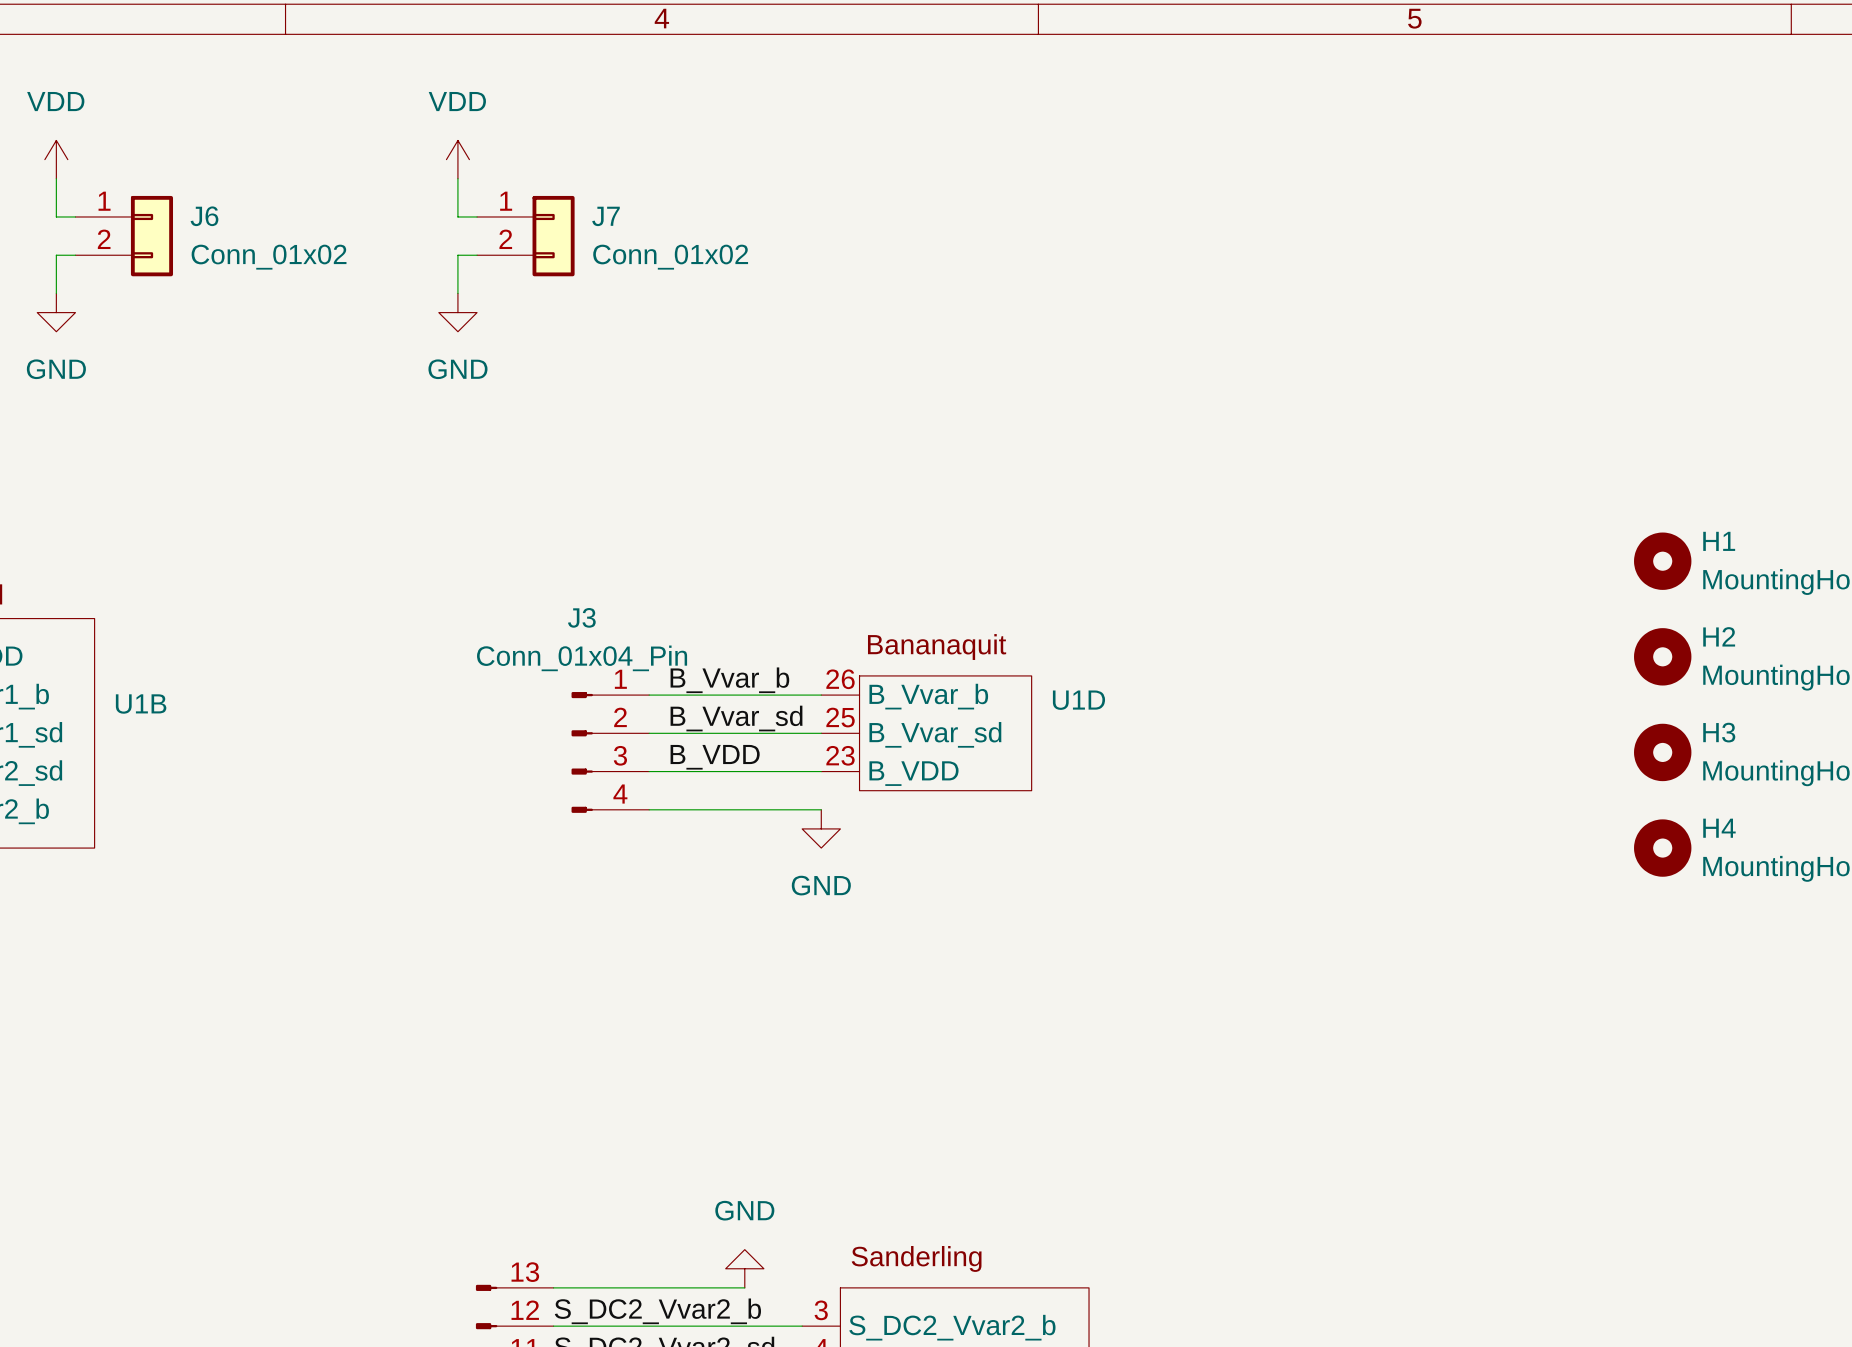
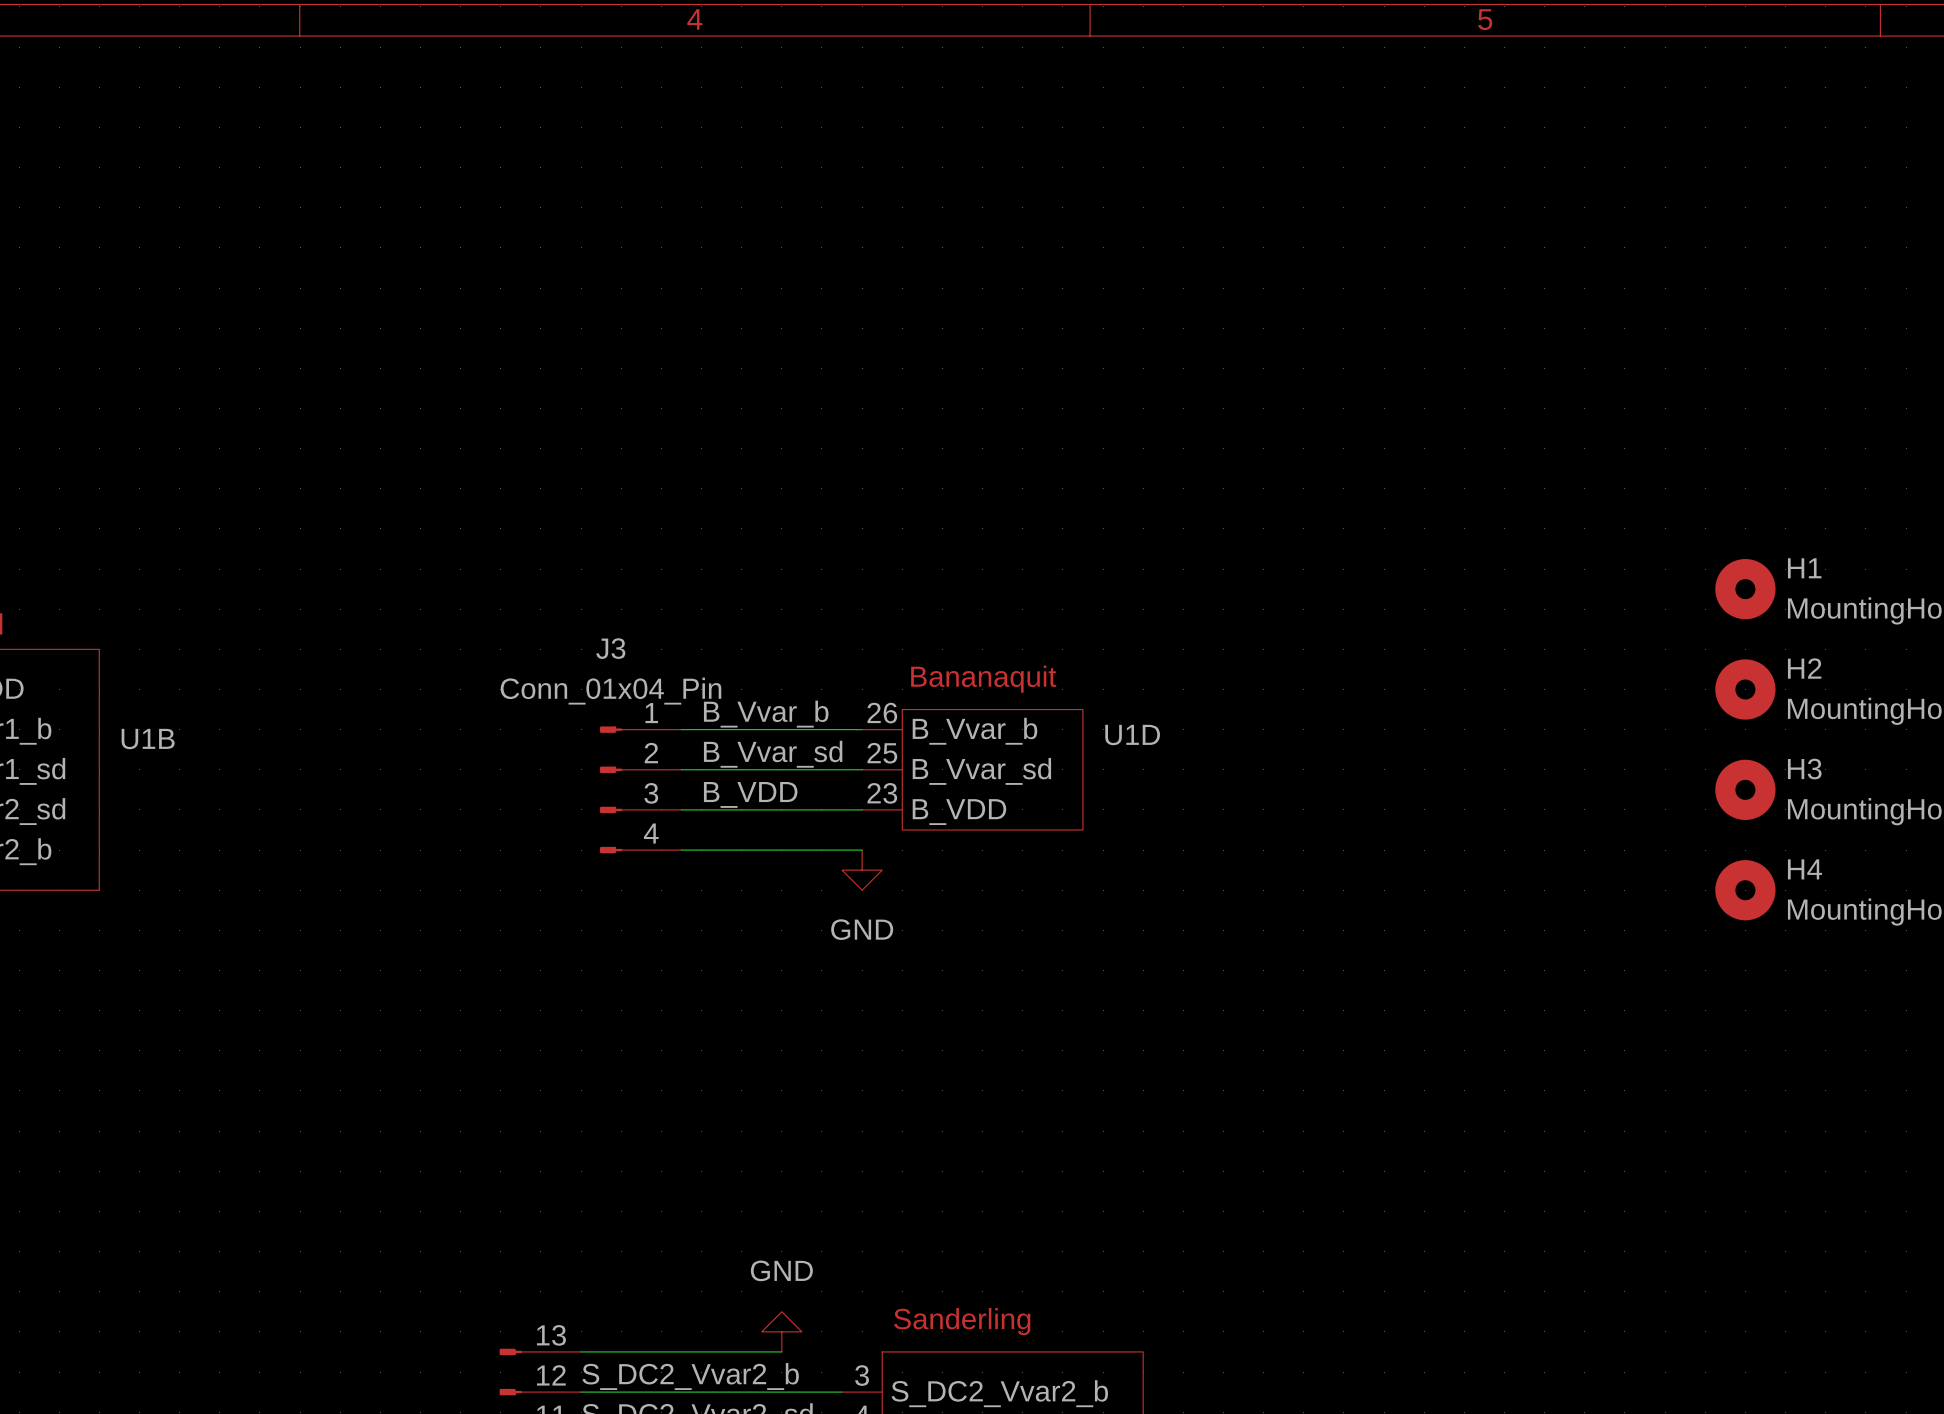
power symbol: VDD (56, 159) -> none
power symbol: VDD (457, 159) -> none
wire: (56, 178) (56, 216) (75, 216) -> none
wire: (457, 178) (457, 216) (477, 216) -> none
J6: Conn_01x02 (124, 236) -> none
J7: Conn_01x02 (525, 236) -> none
wire: (75, 255) (56, 255) (56, 293) -> none
wire: (477, 255) (457, 255) (457, 293) -> none
power symbol: GND (56, 312) -> none
power symbol: GND (457, 312) -> none

